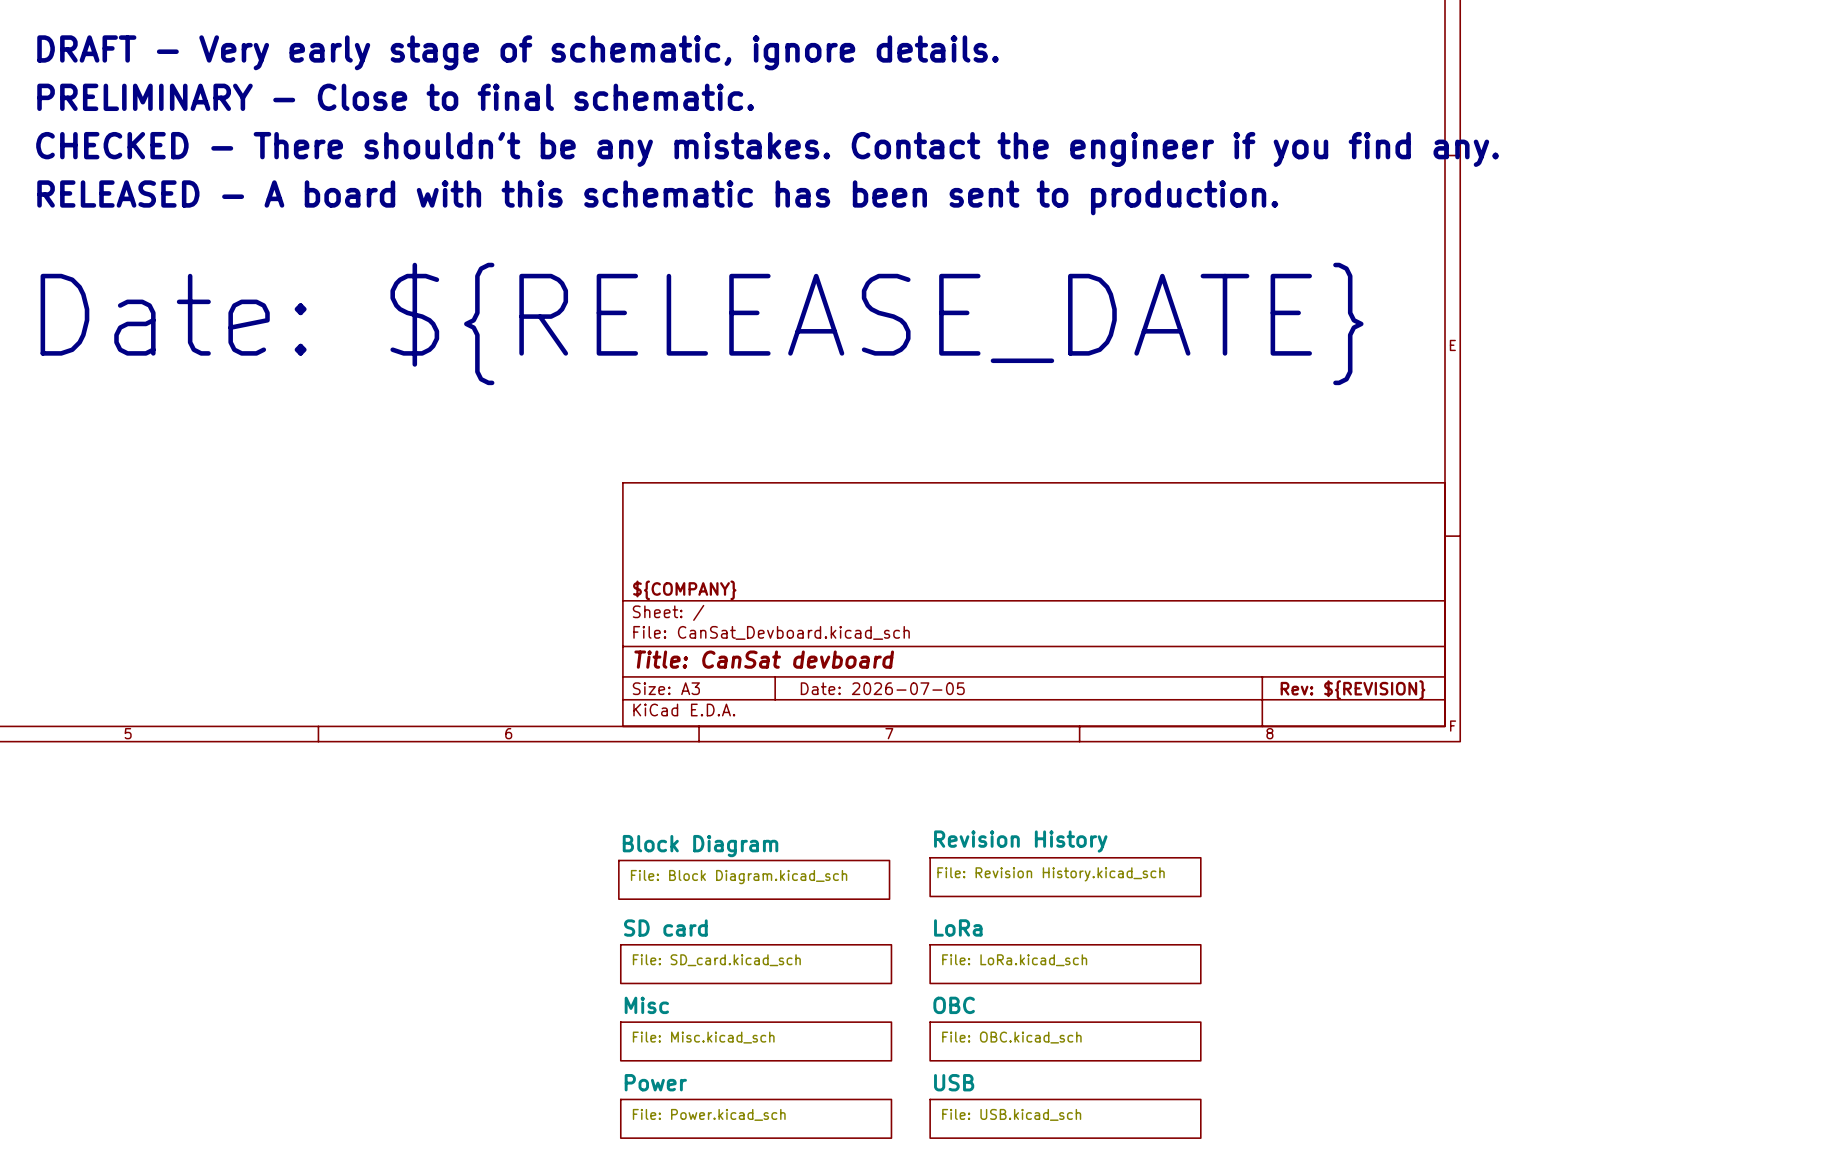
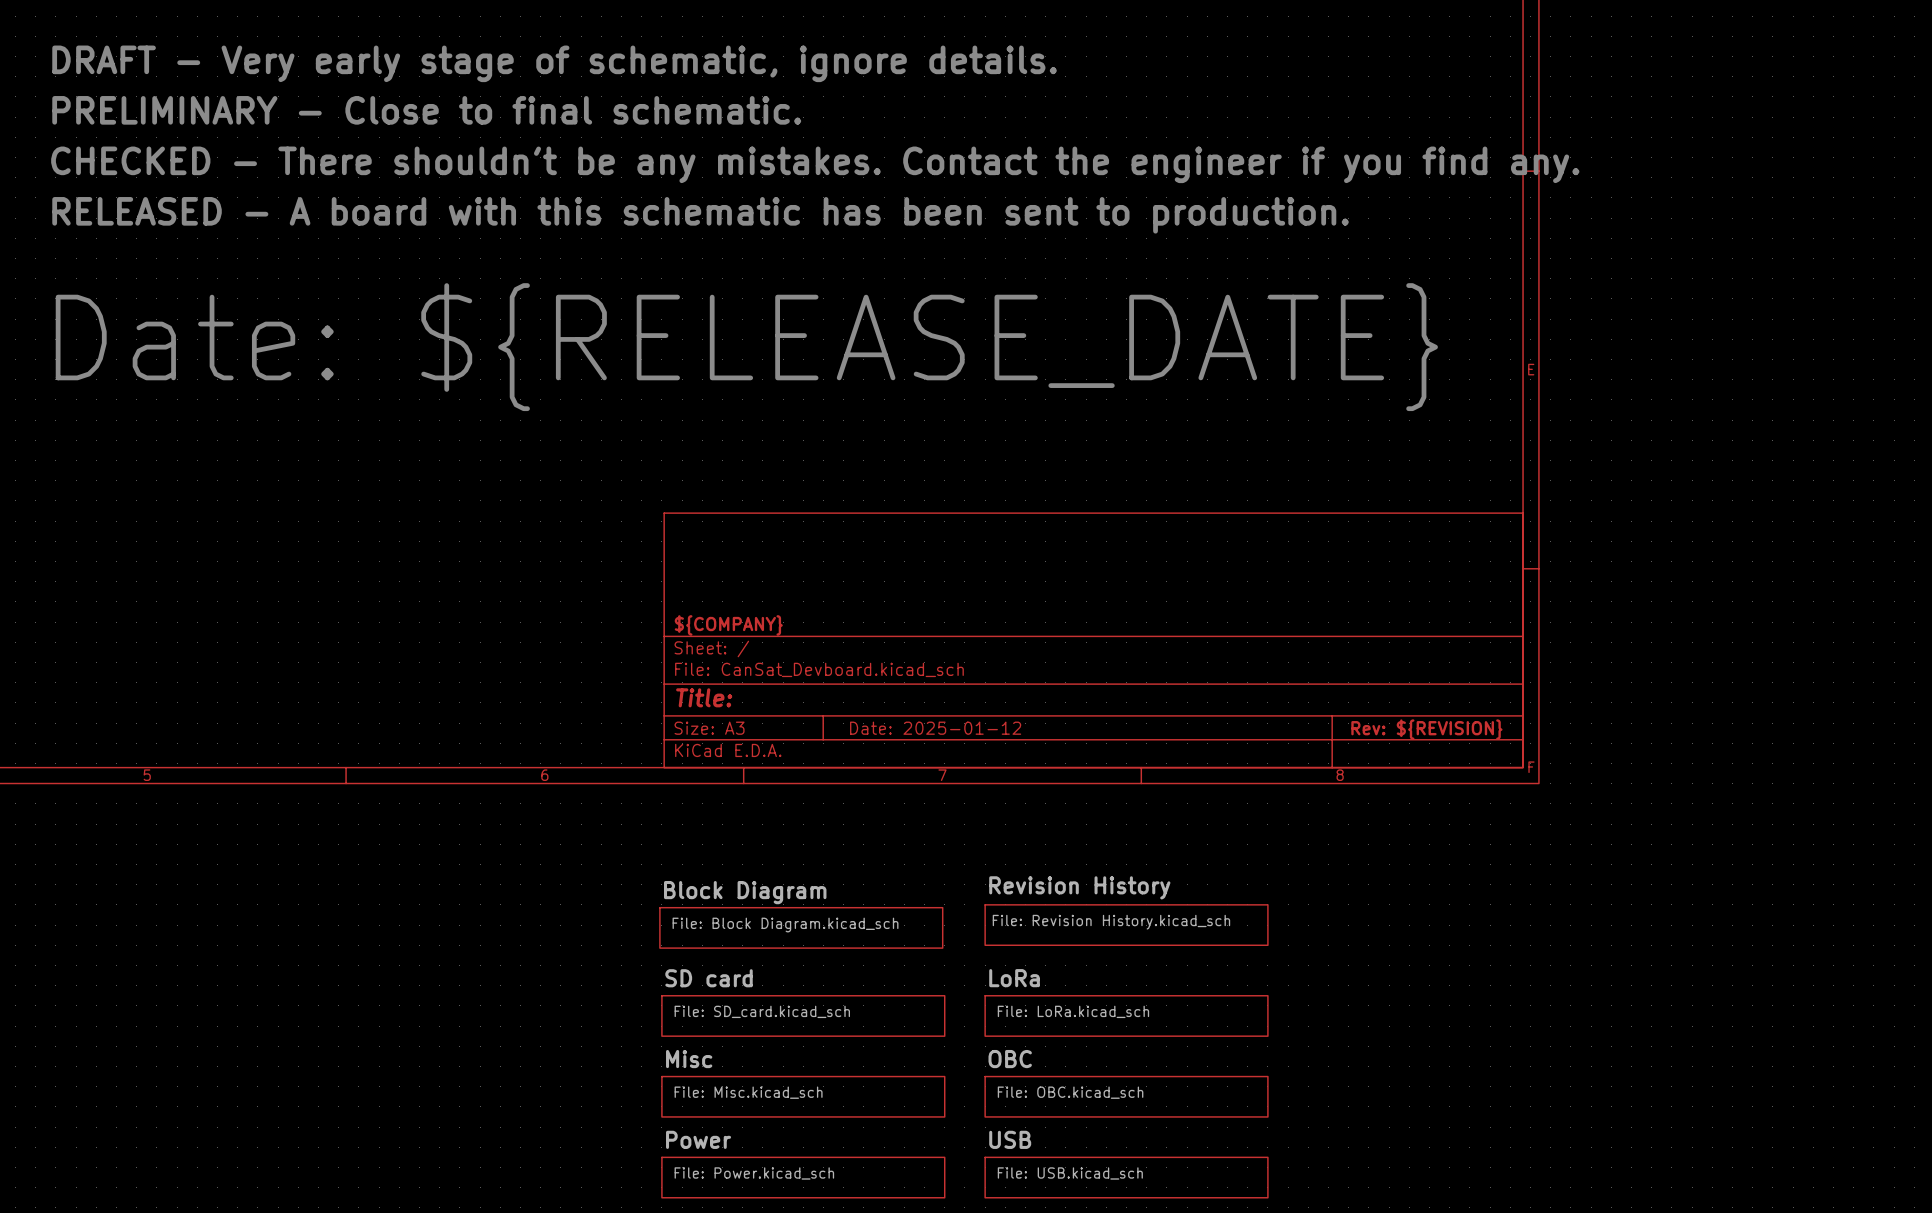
title block: Title: CanSat devboard (764, 659) -> Title: (704, 697)
title block: Date: 2026-07-05 (882, 688) -> Date: 2025-01-12 (935, 728)

